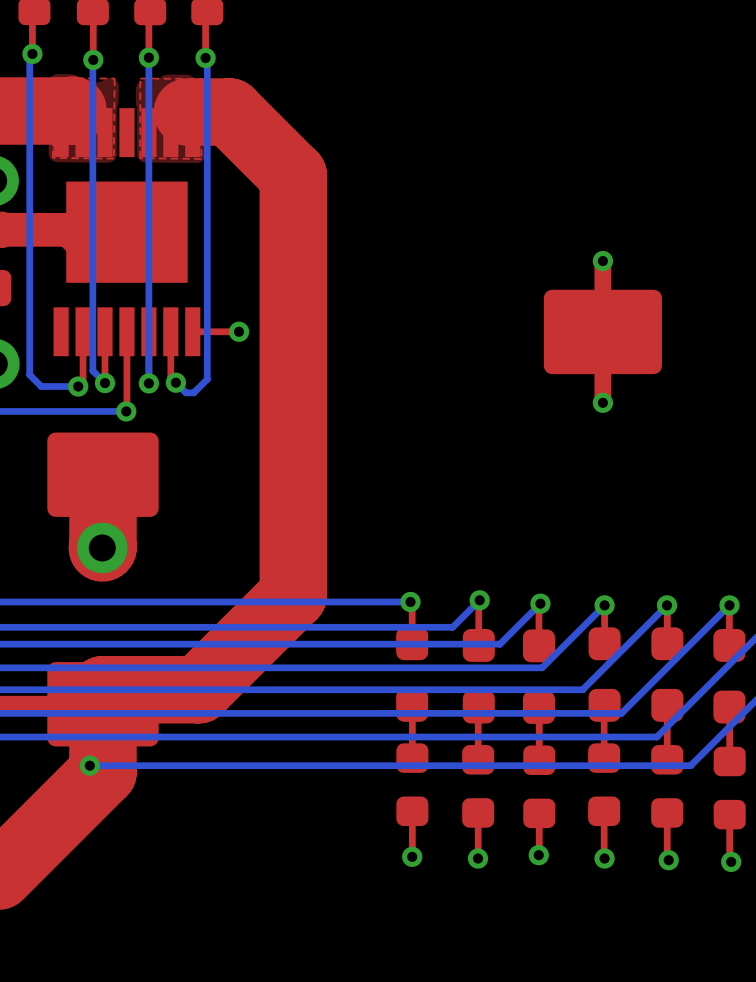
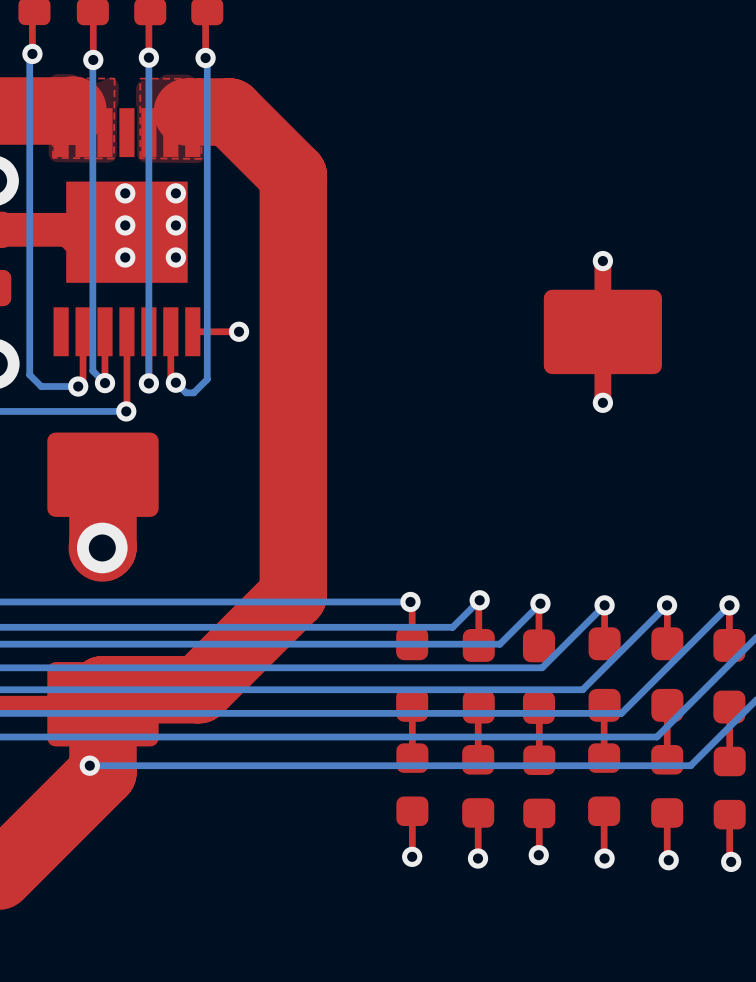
via: none -> (125, 193)
via: none -> (175, 193)
via: none -> (125, 225)
via: none -> (175, 225)
via: none -> (125, 257)
via: none -> (175, 257)

